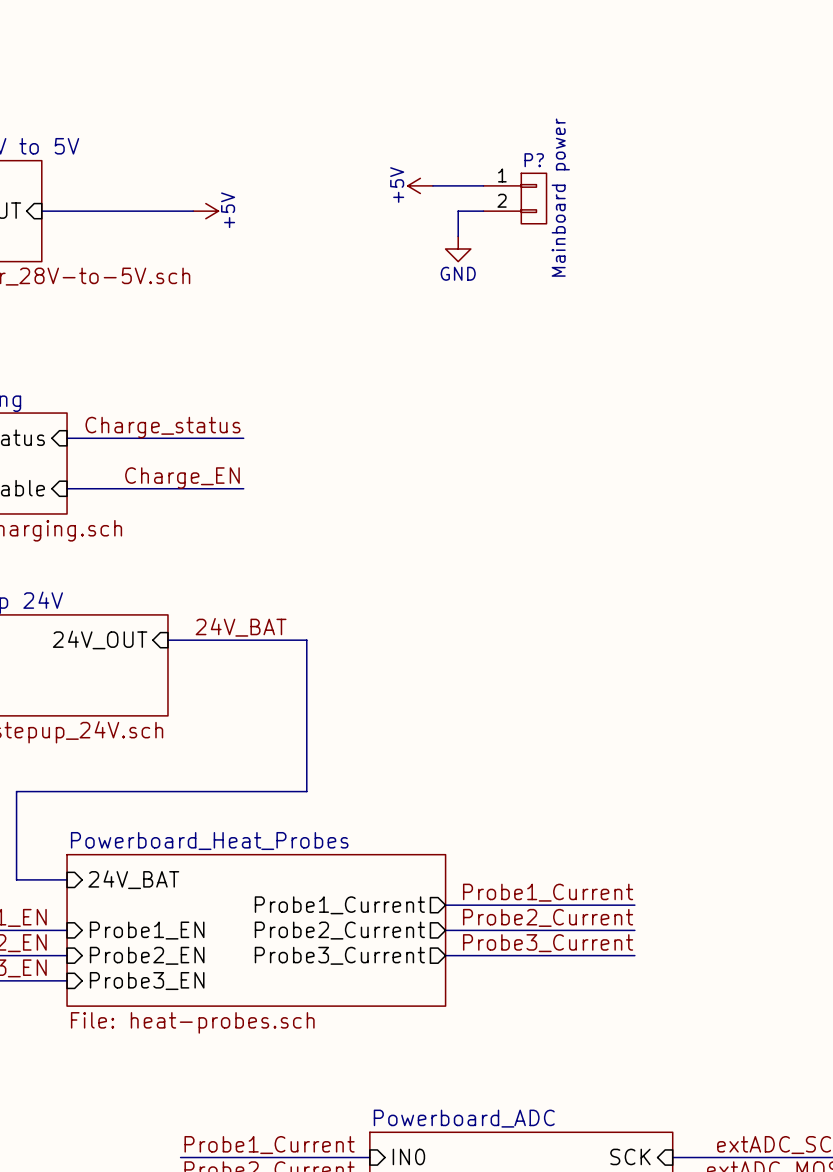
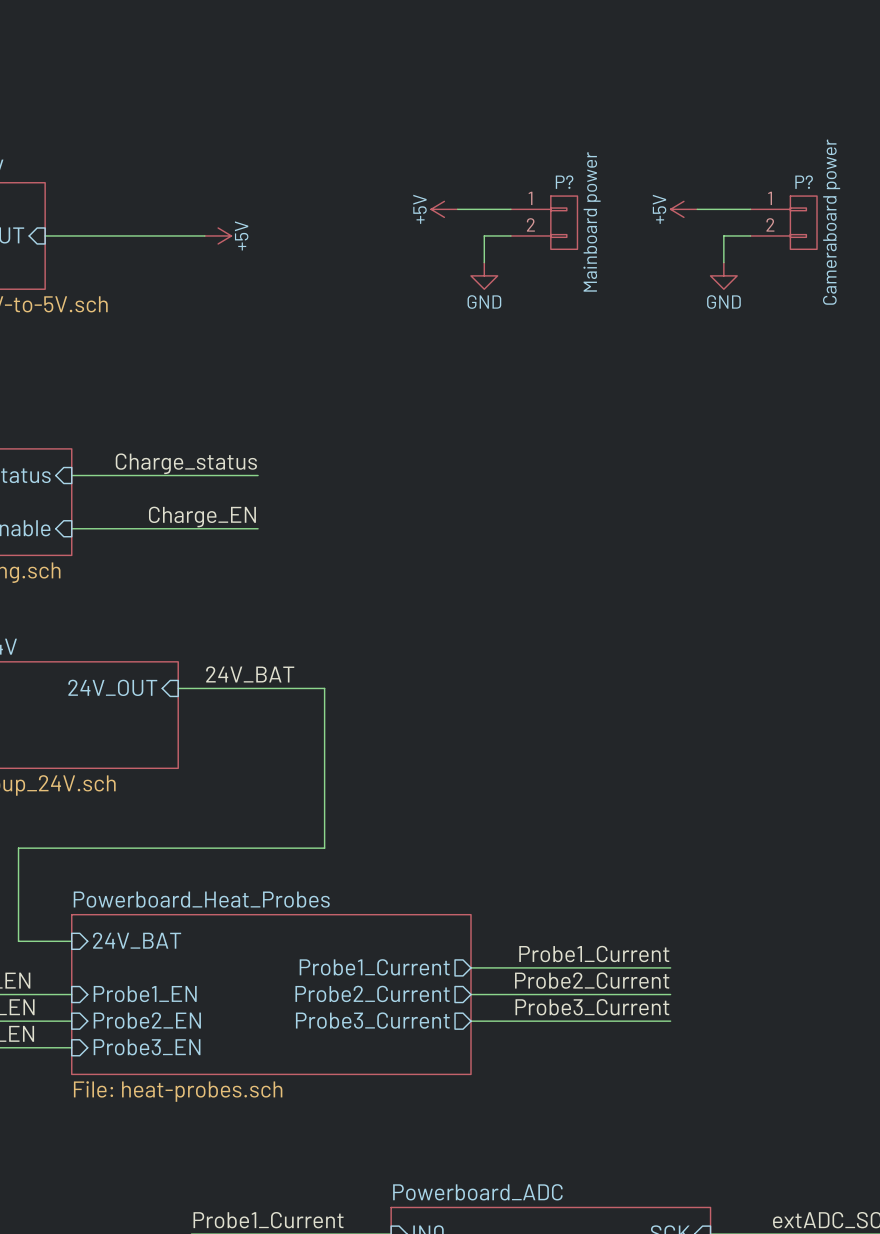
power symbol: none -> +5V (683, 209)
wire: none -> (697, 209) (750, 209)
P?: none -> Cameraboard power (783, 222)
wire: none -> (750, 235) (723, 235) (723, 262)
power symbol: none -> GND (723, 275)

